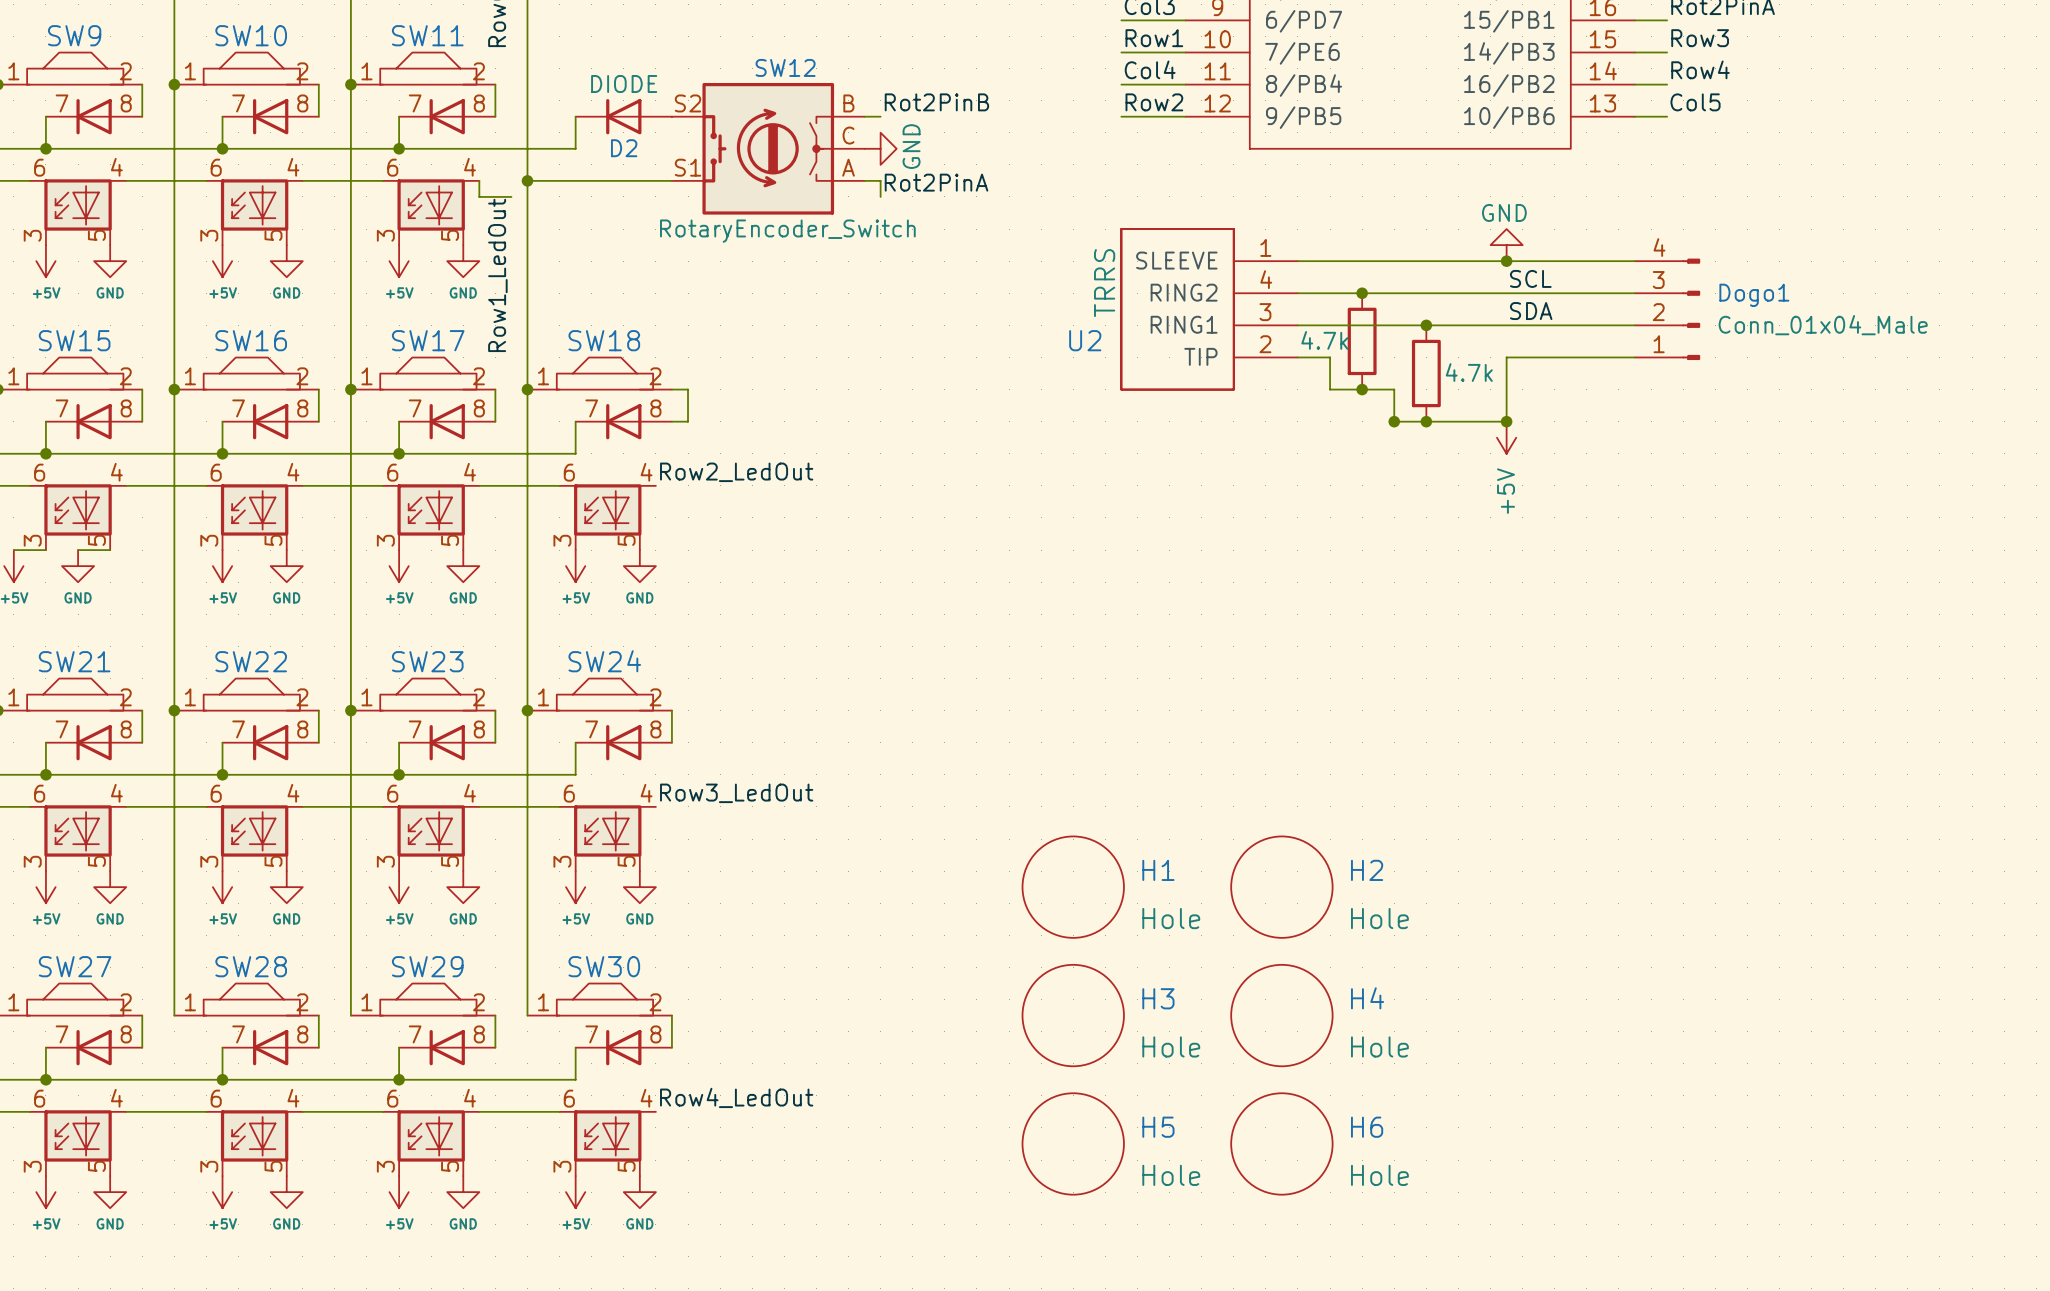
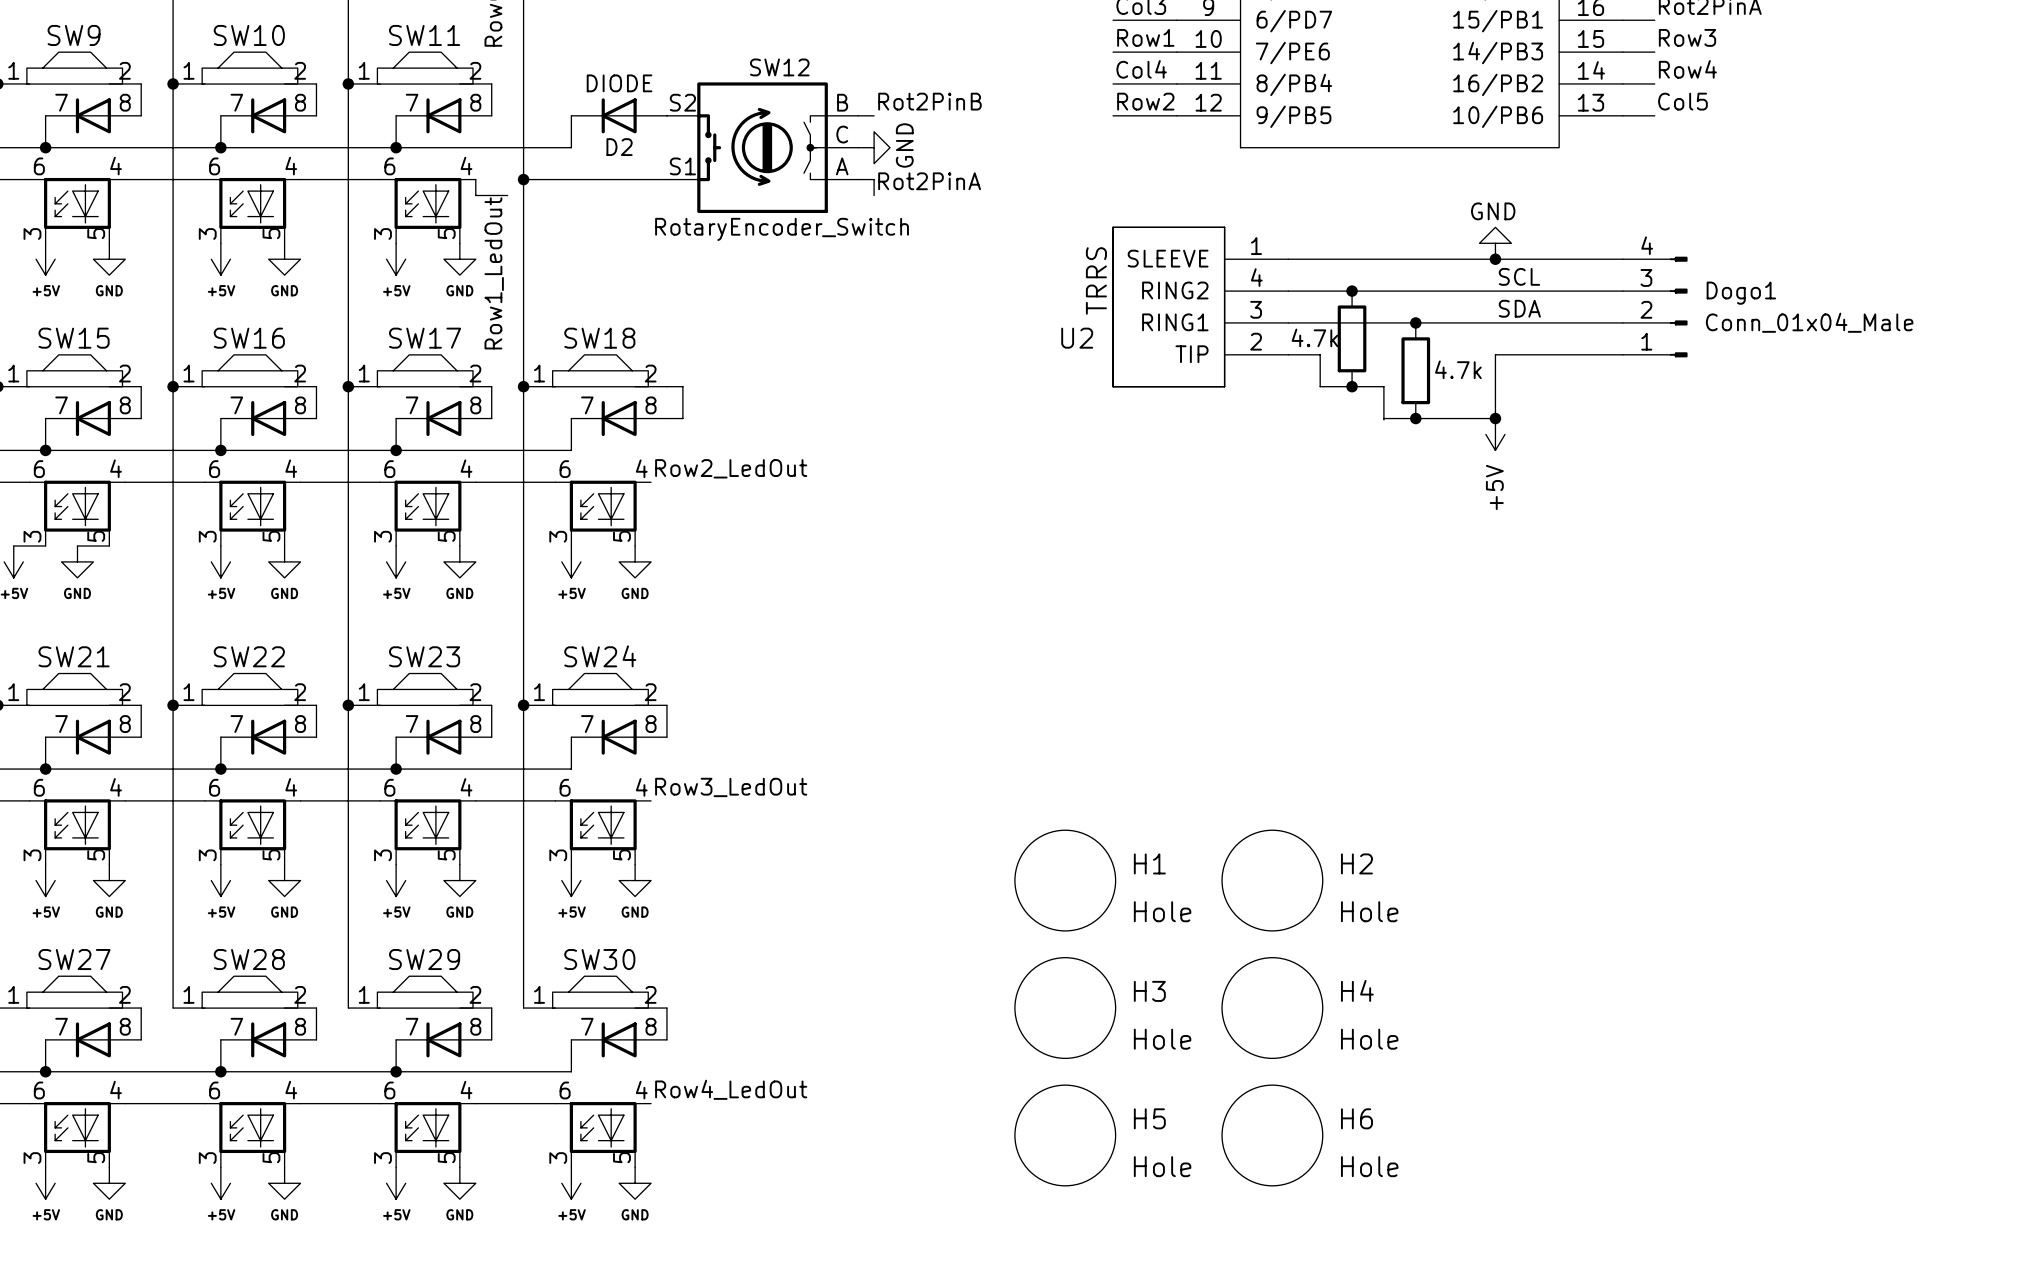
junction: (1394, 421) -> none

